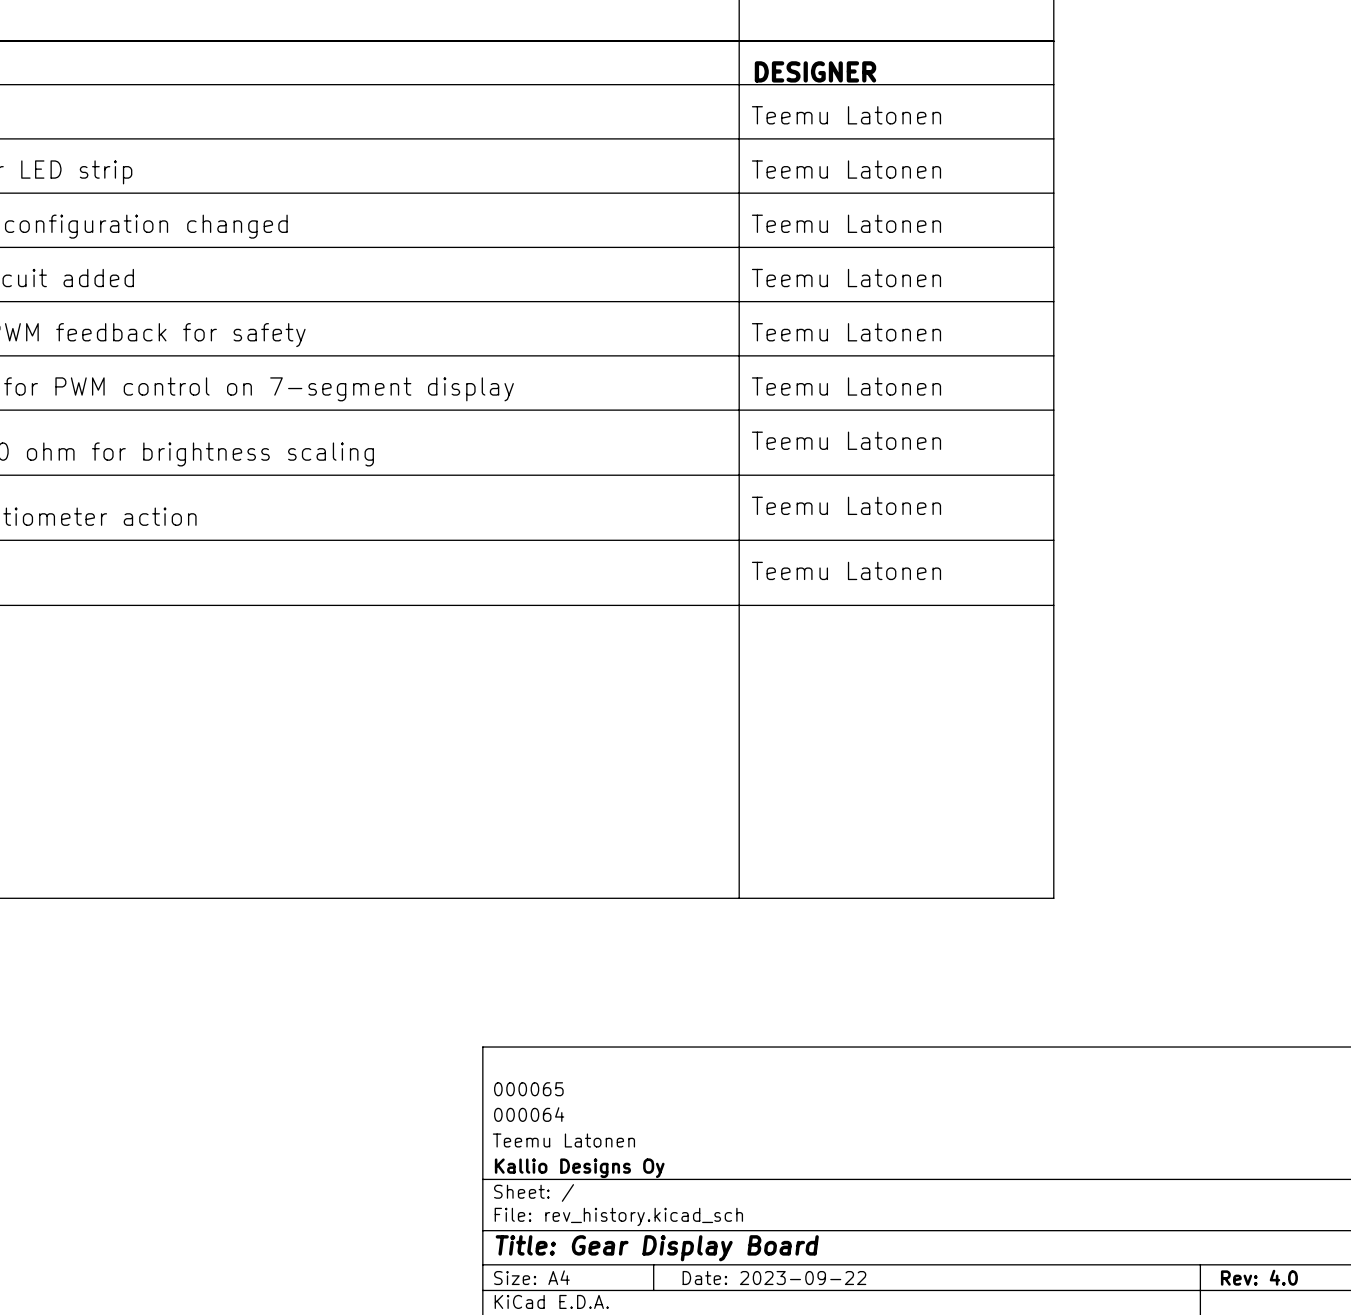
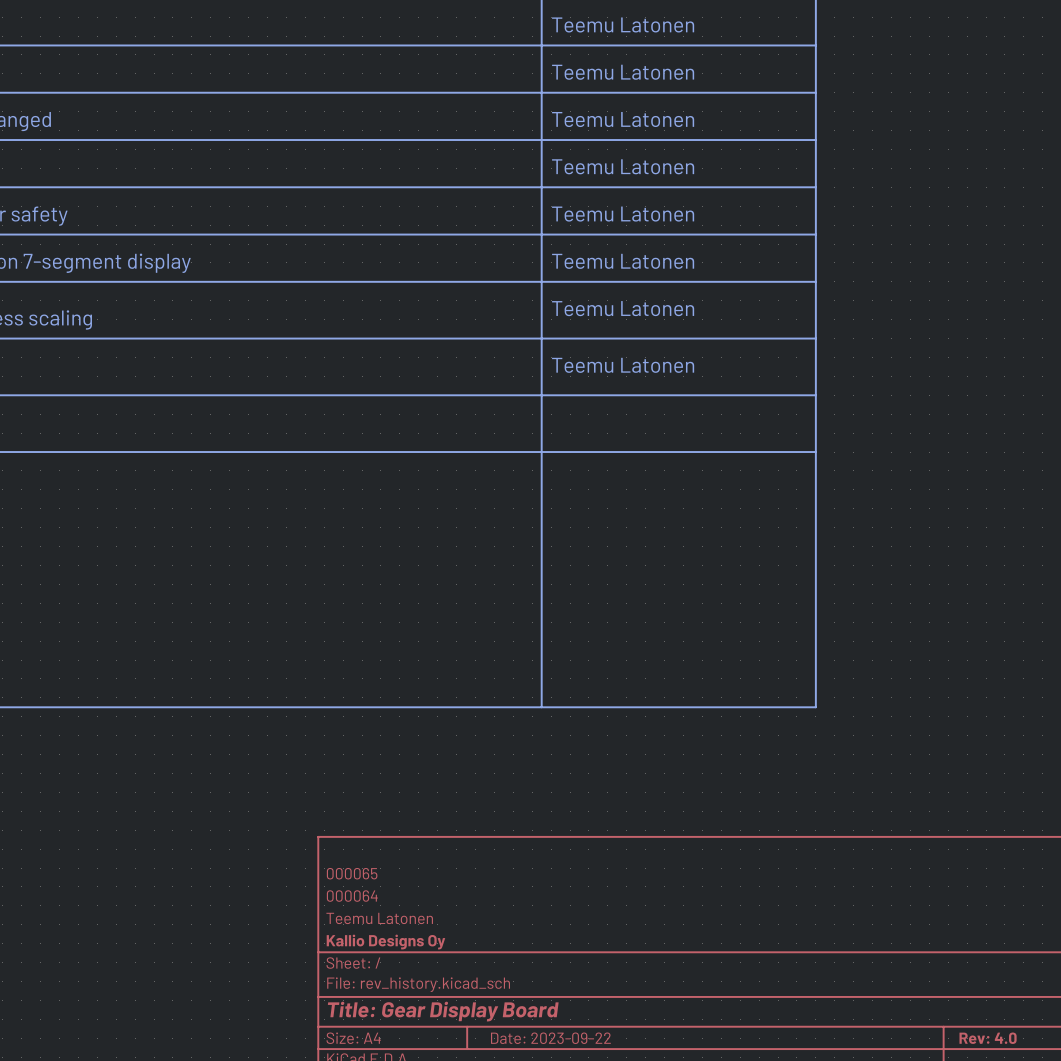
text: Teemu Latonen (846, 570) -> none

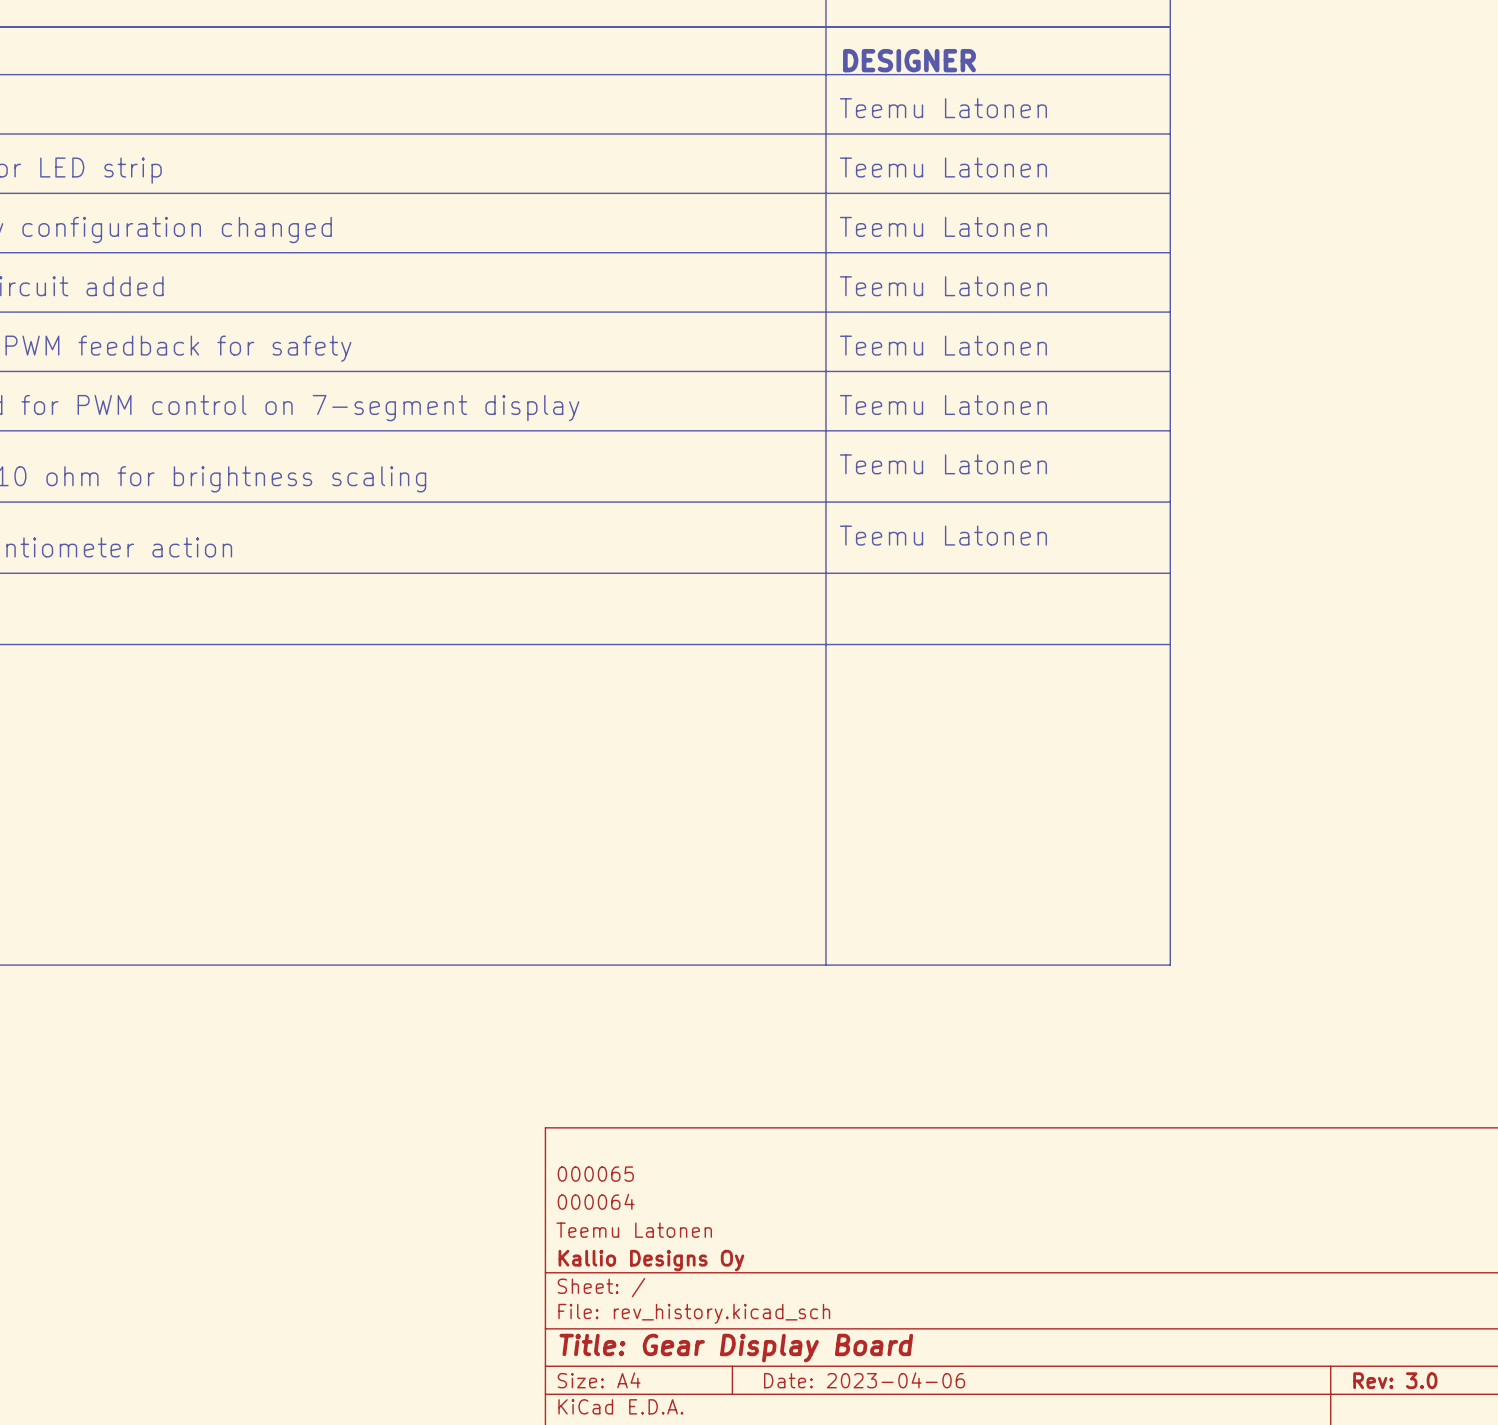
title block: Date: 2023-09-22 (550, 1038) -> Date: 2023-04-06 (864, 1380)
title block: Rev: 4.0 (988, 1038) -> Rev: 3.0 (1395, 1380)

